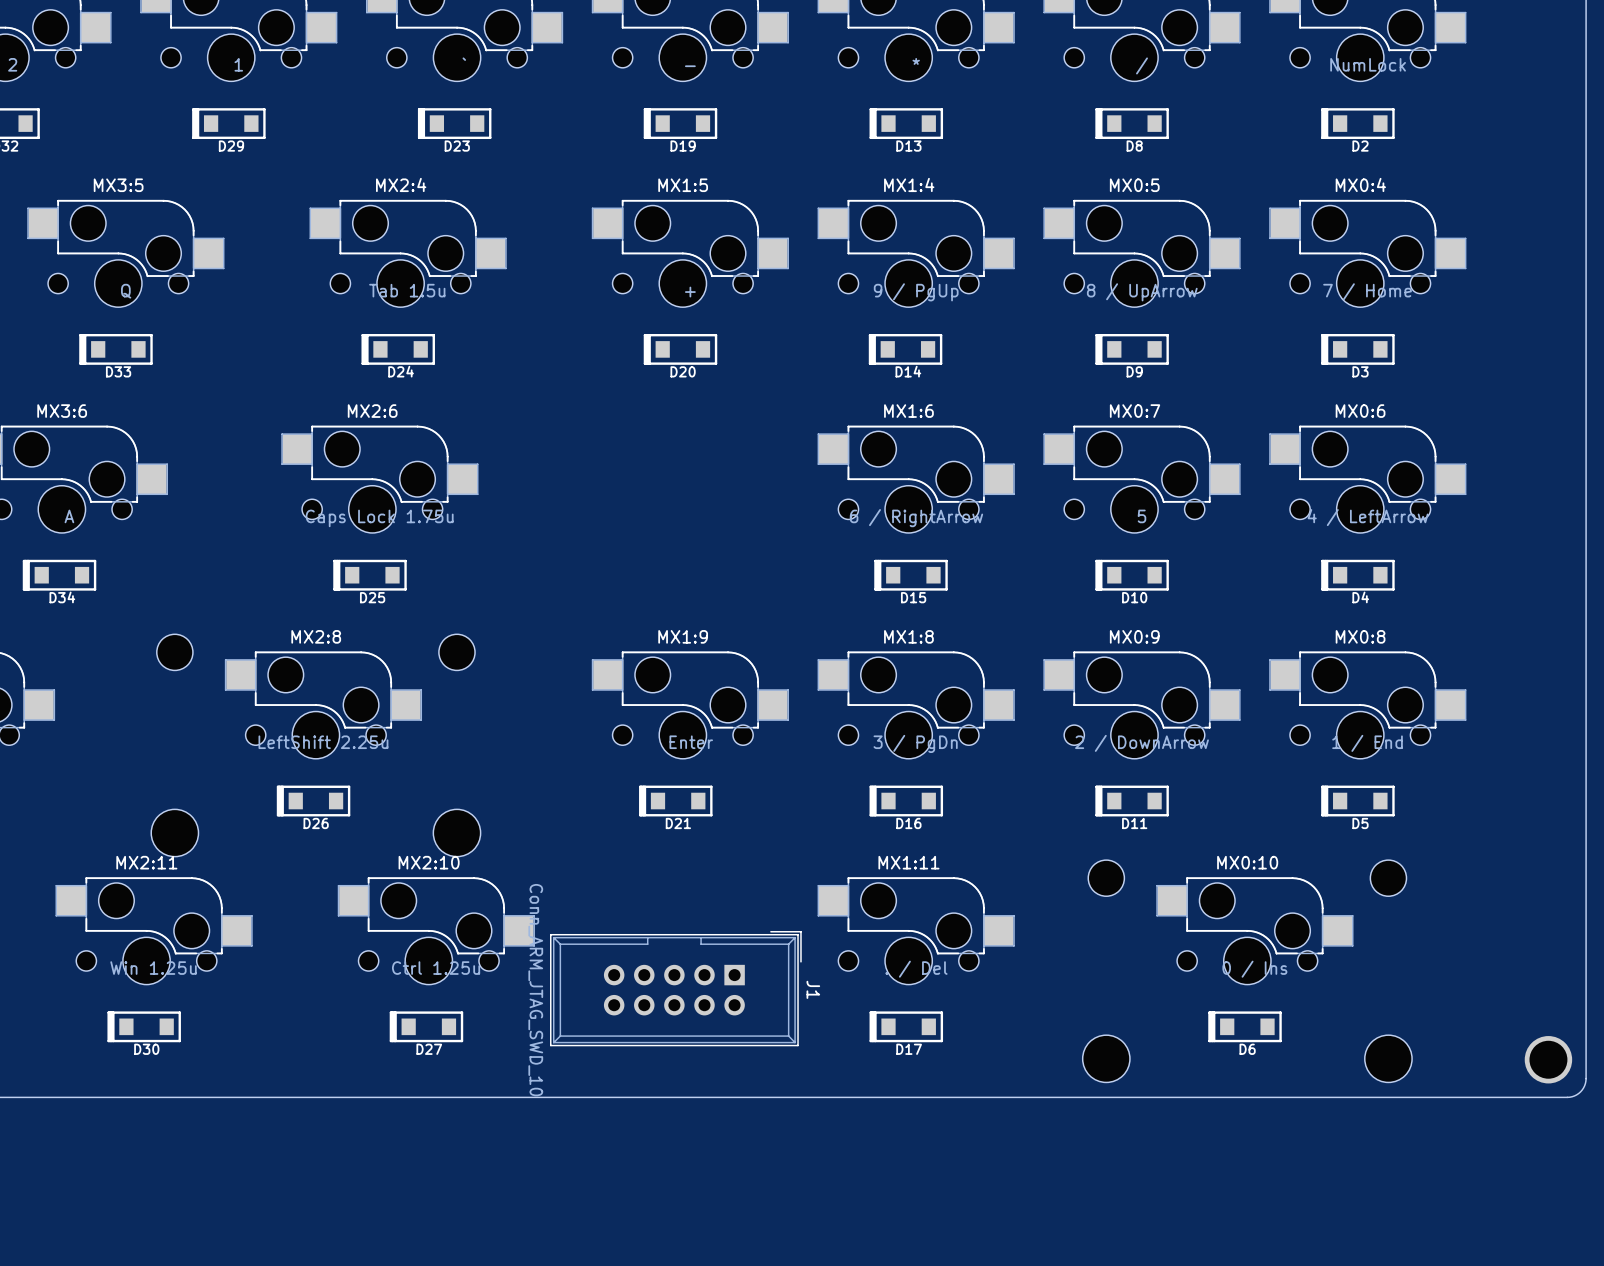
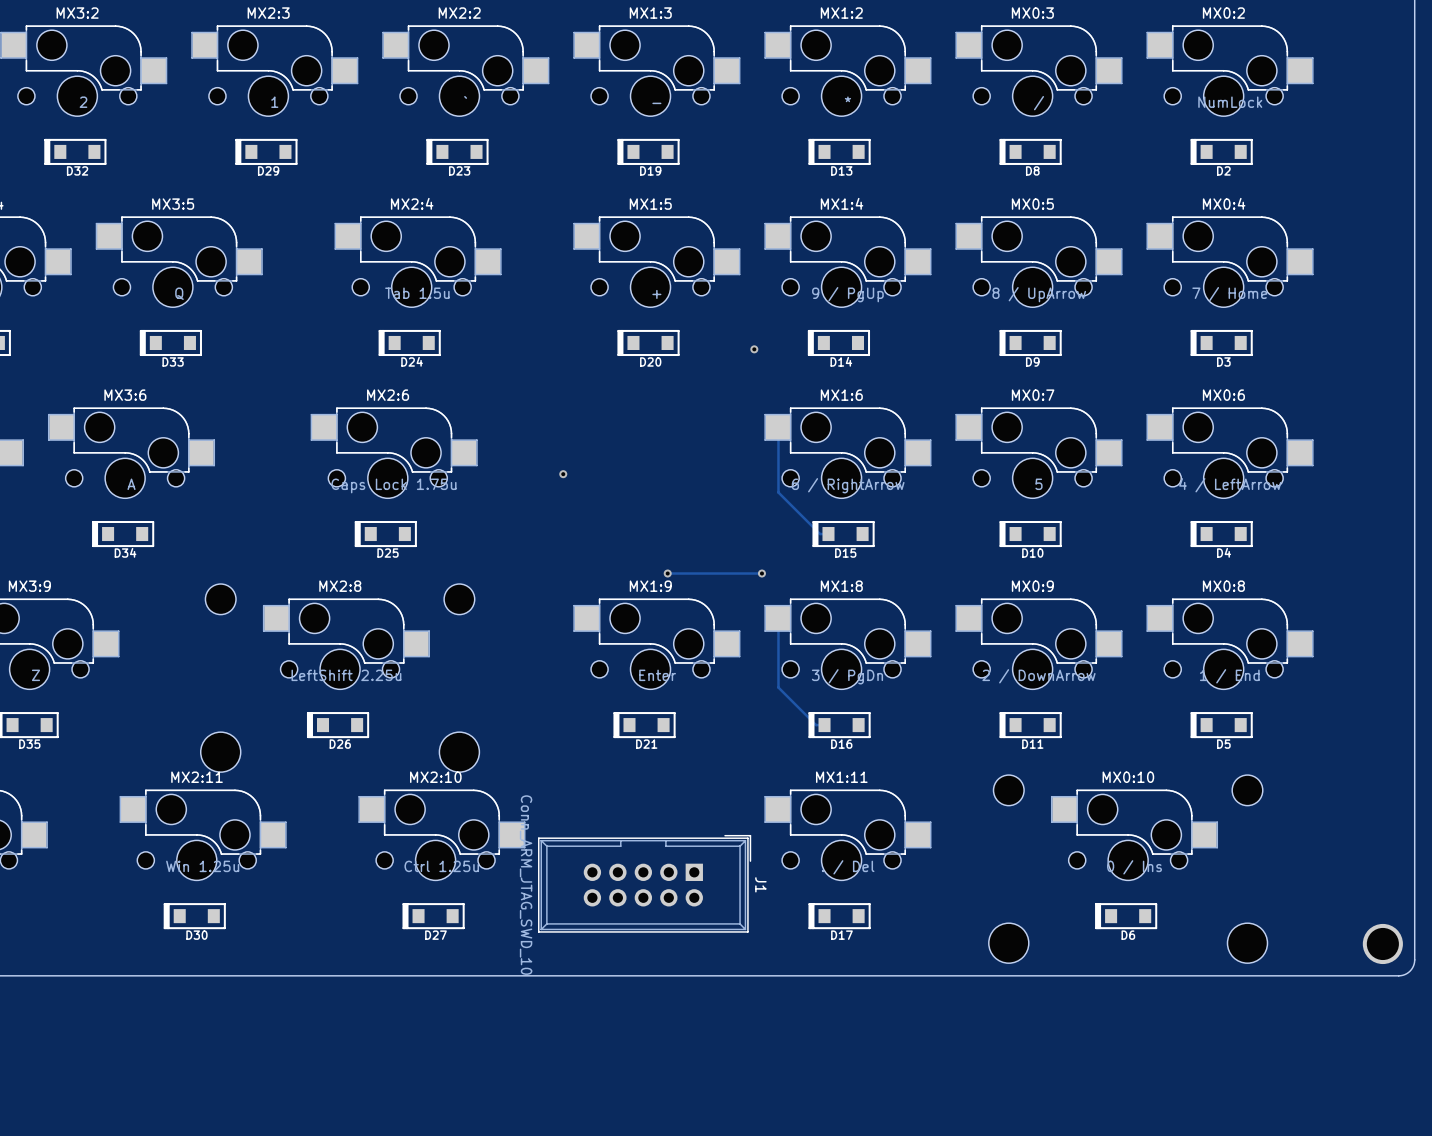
via: none -> (754, 349)
track: none -> (778, 427) (778, 492) (819, 534) (828, 534)
via: none -> (563, 474)
via: none -> (667, 573)
track: none -> (761, 573) (667, 573)
via: none -> (761, 573)
track: none -> (778, 618) (778, 687) (815, 725) (824, 725)

